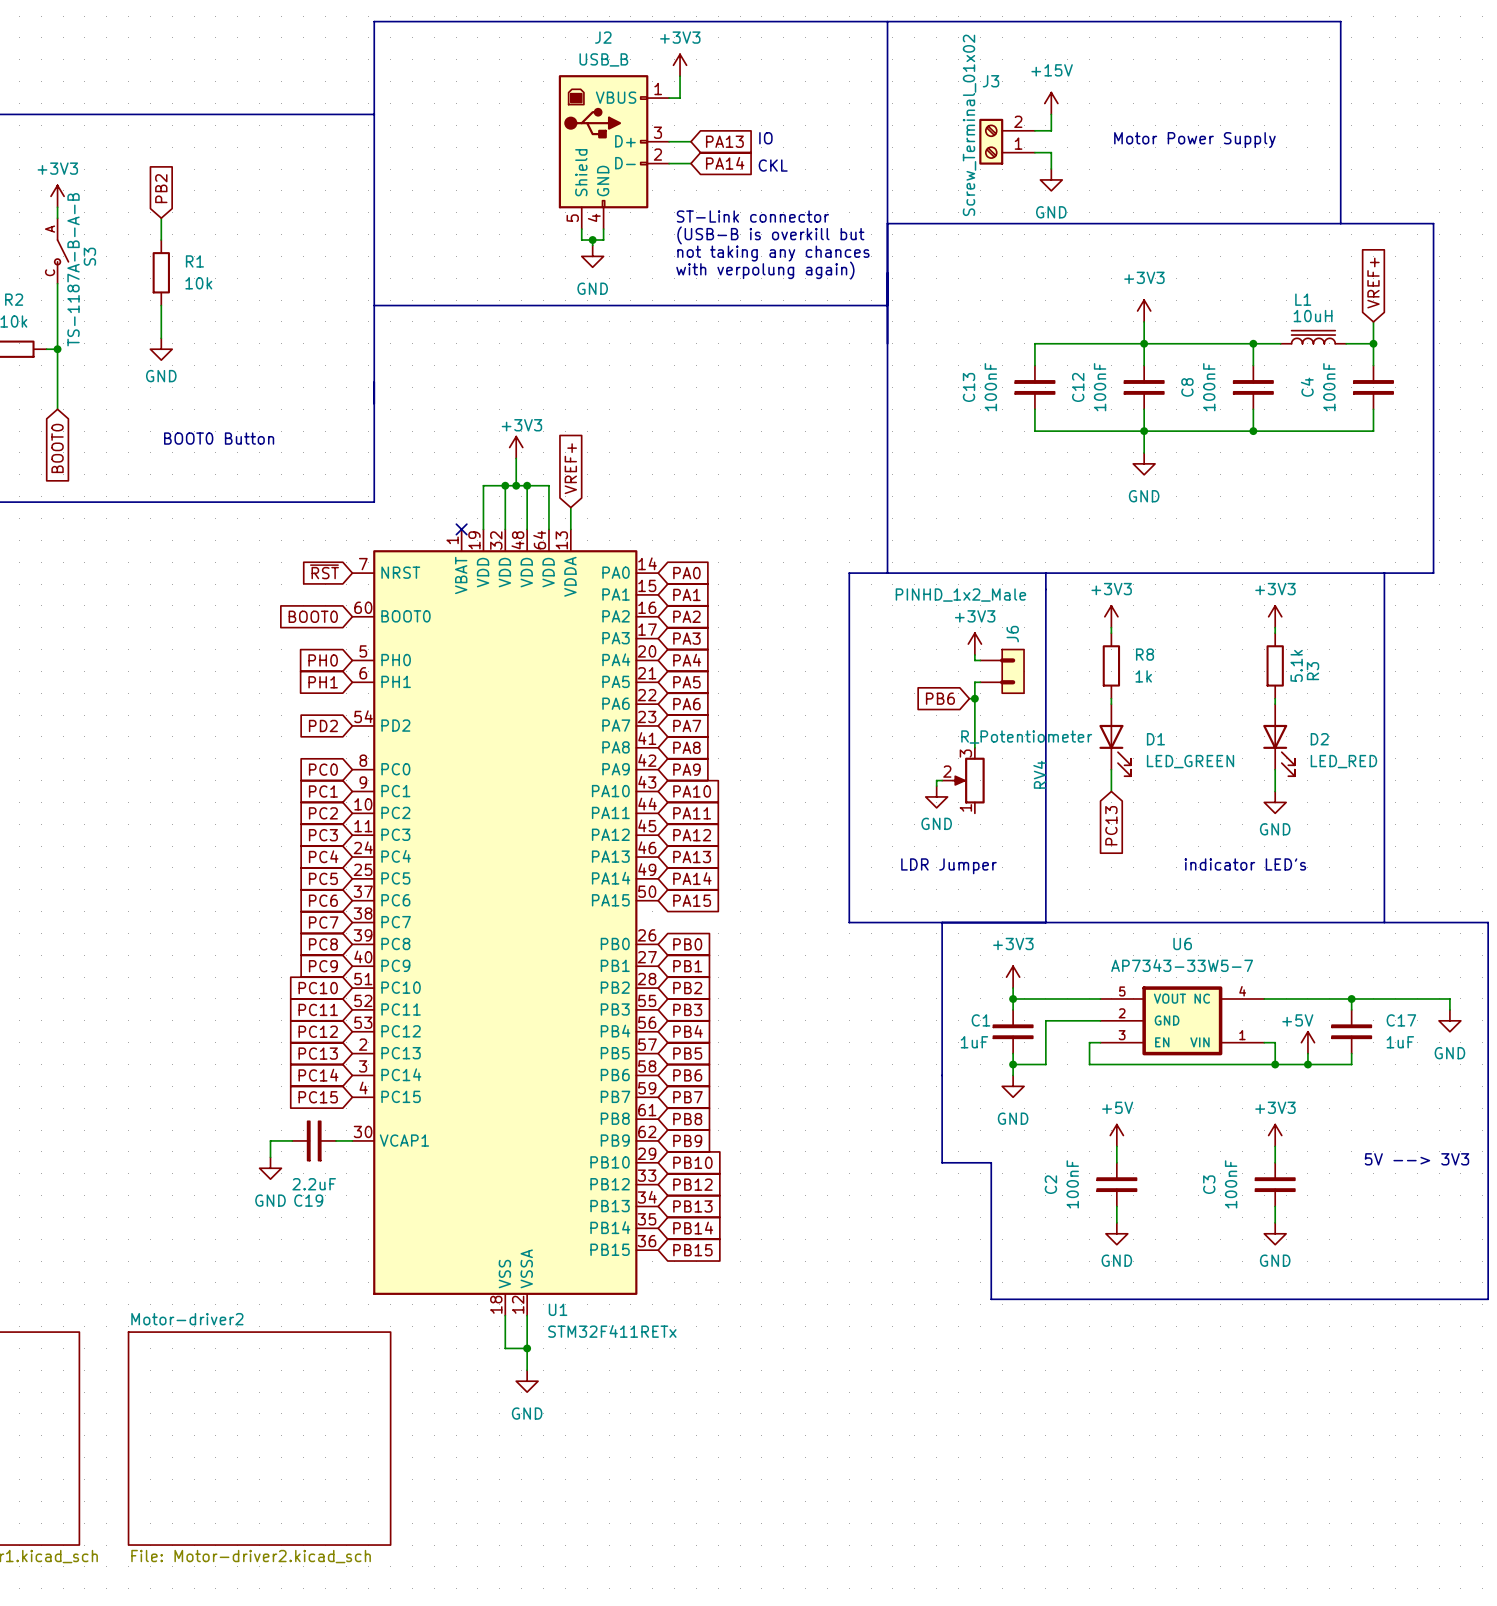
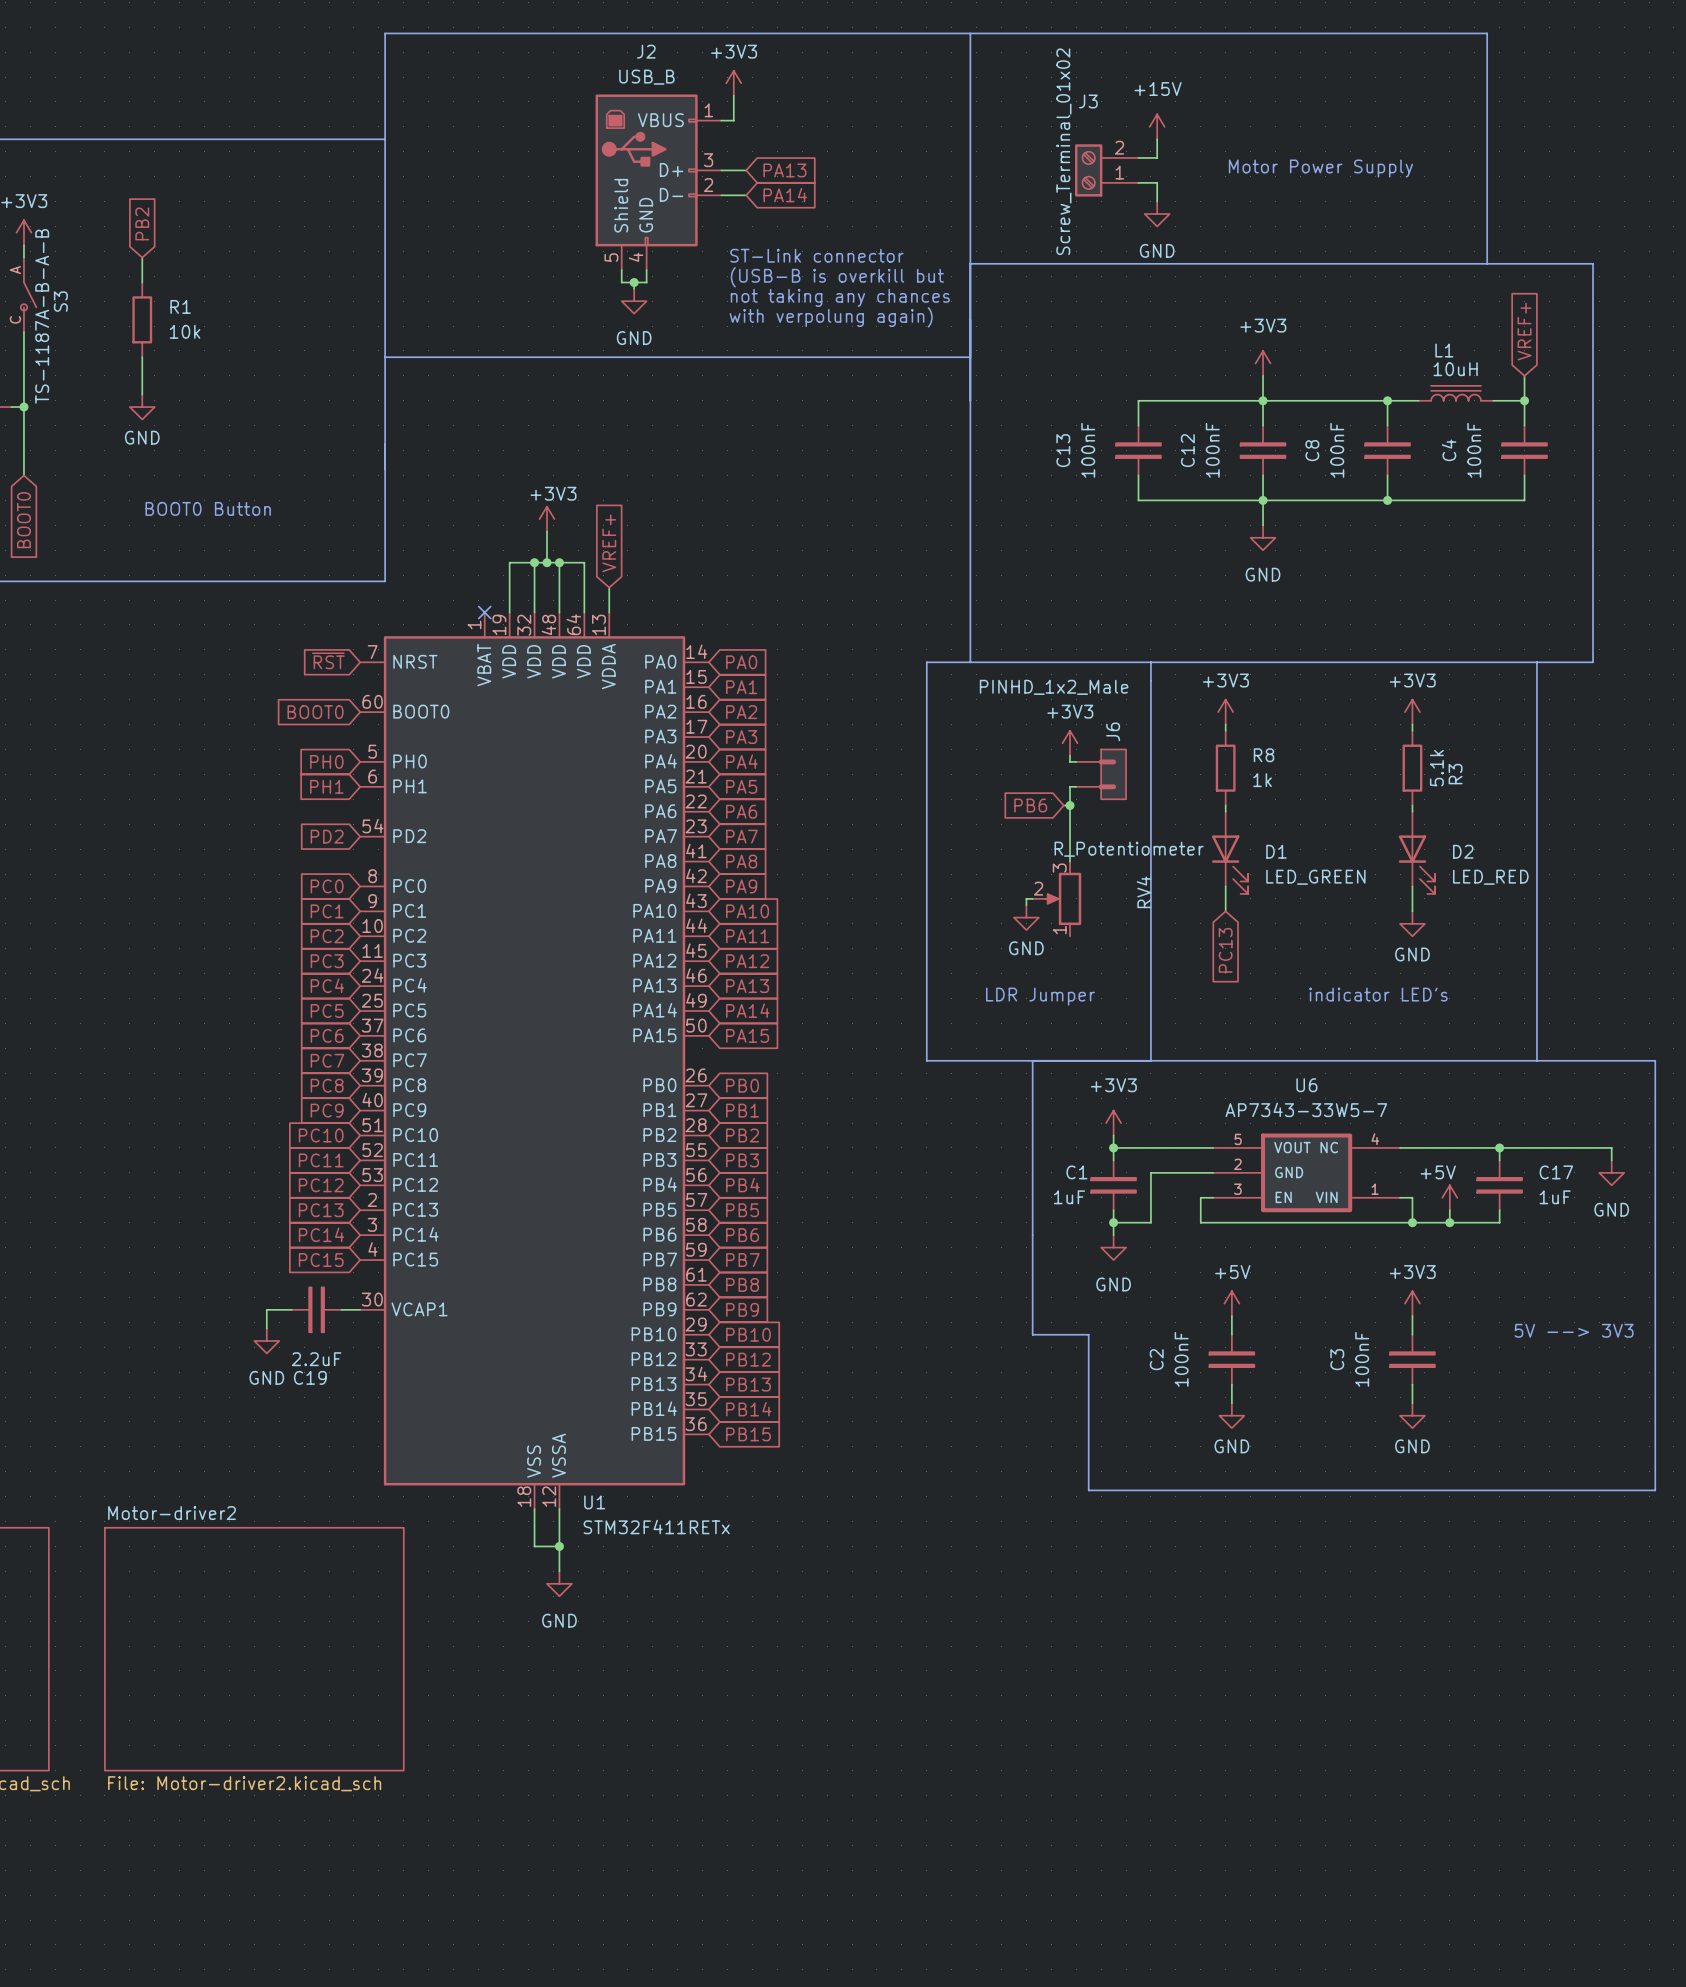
text: IO (765, 138) -> none
text: CKL (773, 165) -> none

